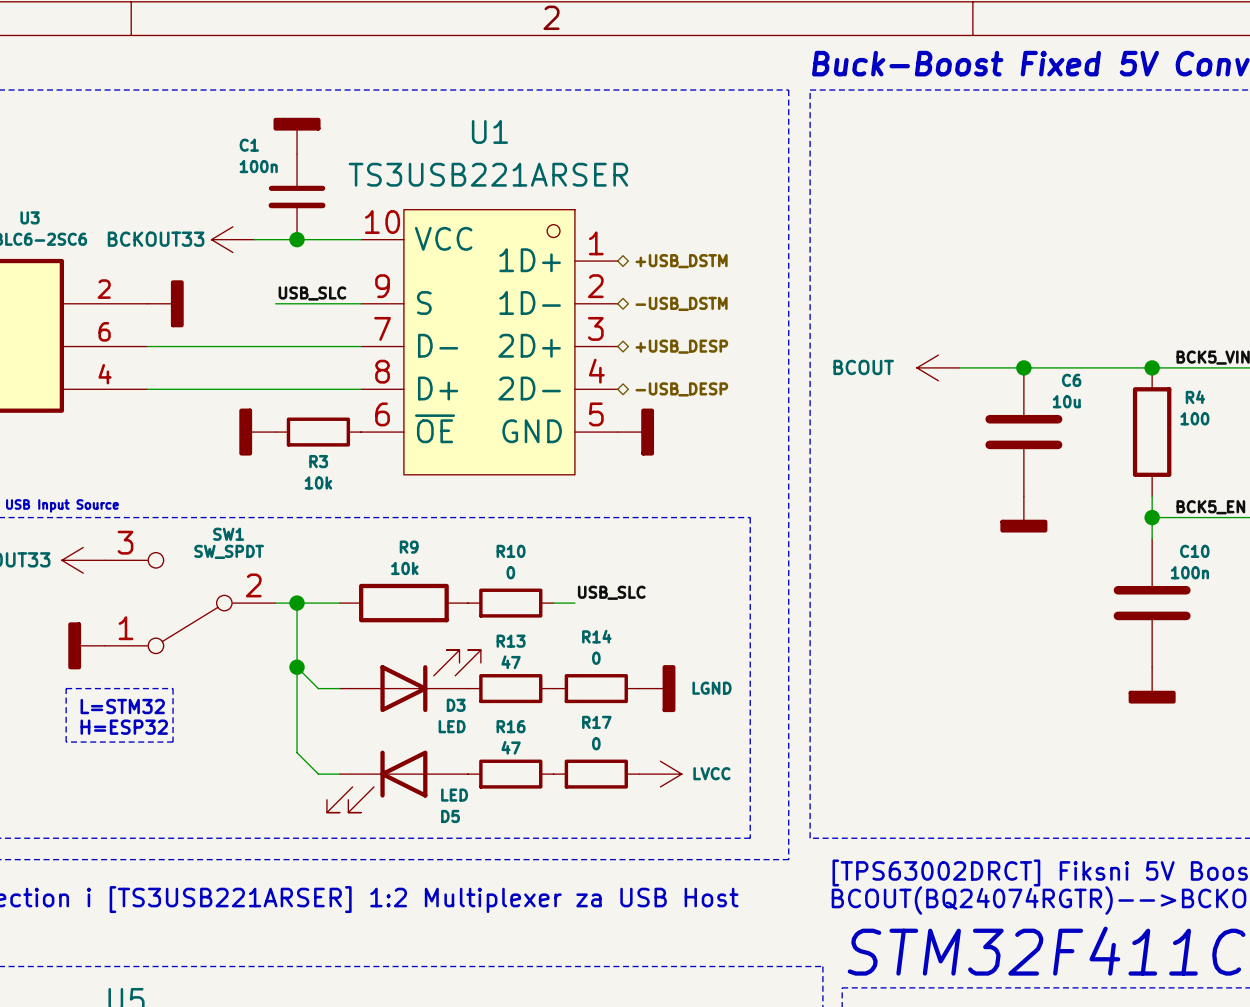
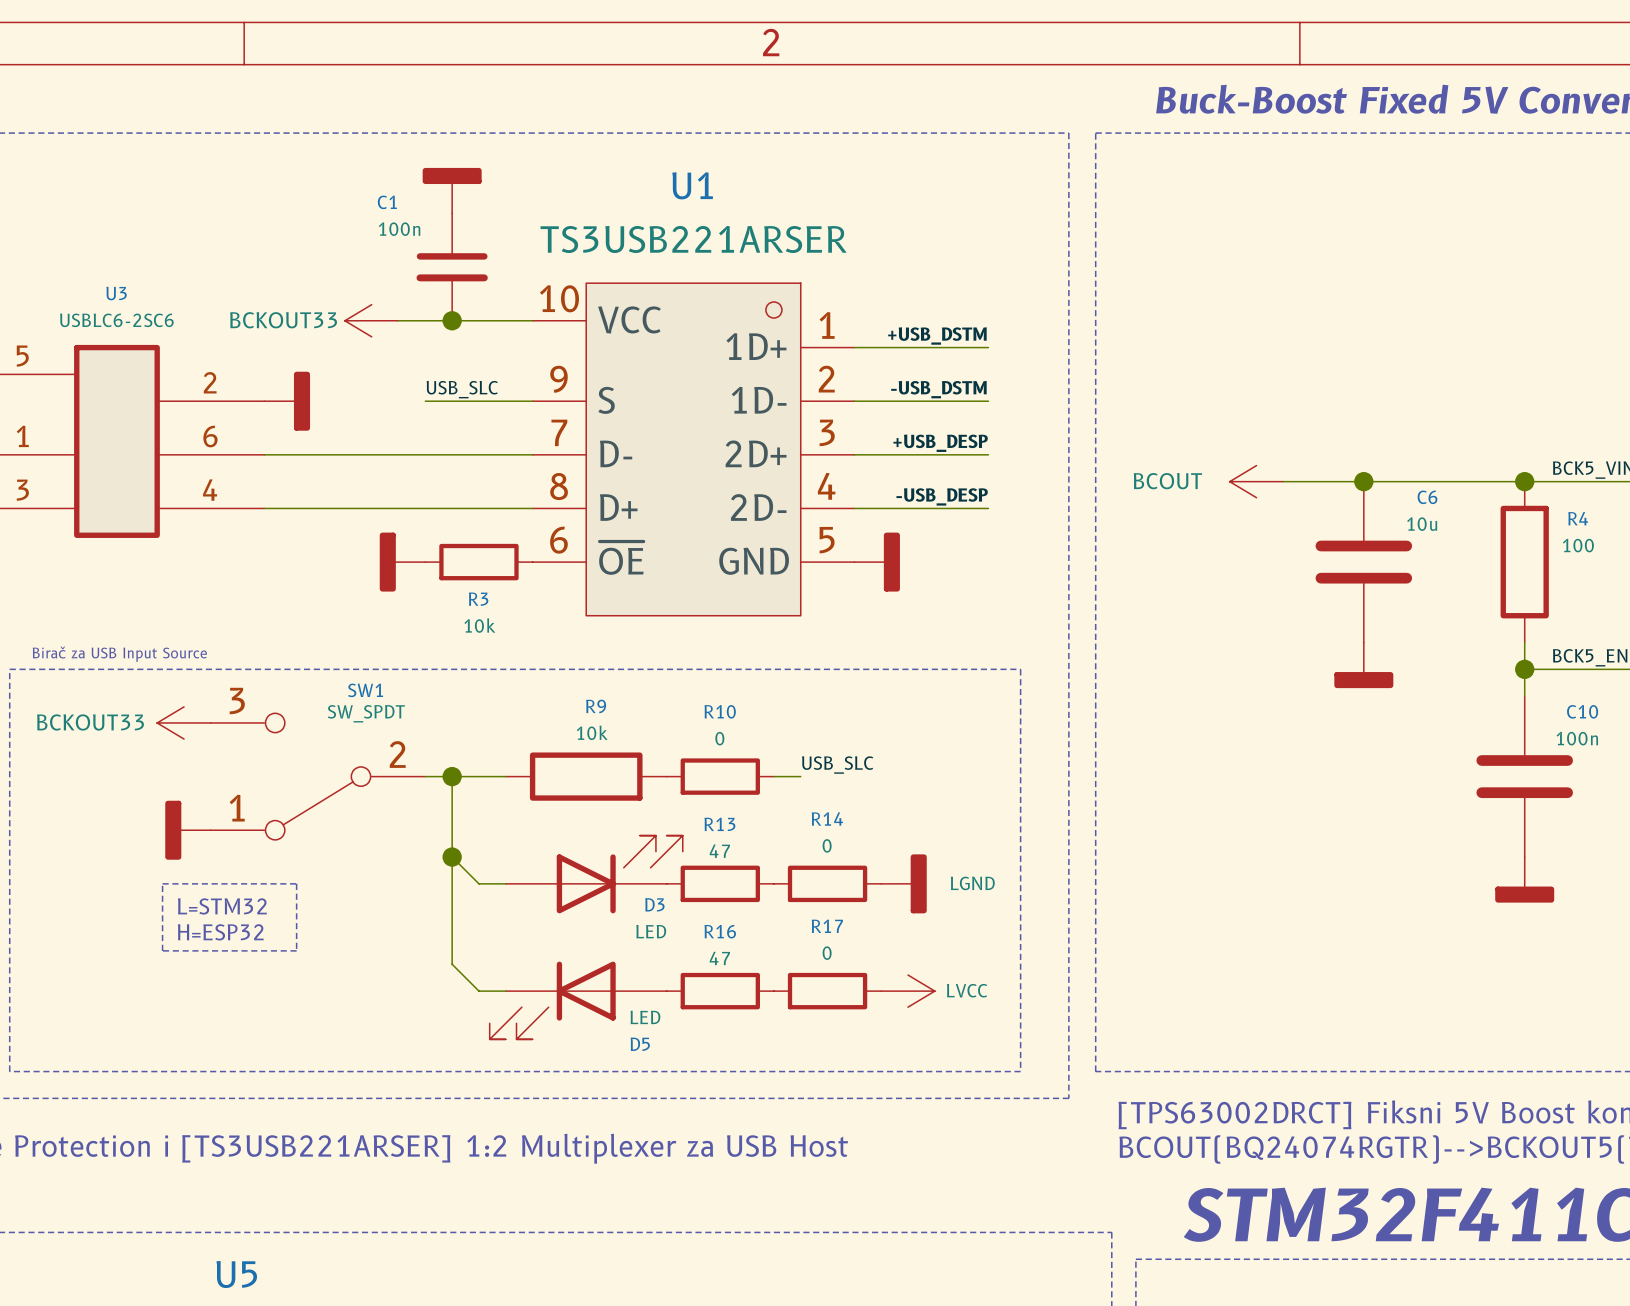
label: none -> +USB_DSTM (937, 336)
wire: none -> (854, 347) (988, 347)
hierarchical label: +USB_DSTM (681, 261) -> none
label: none -> -USB_DSTM (938, 389)
wire: none -> (854, 401) (988, 401)
hierarchical label: -USB_DSTM (681, 303) -> none
label: none -> +USB_DESP (940, 443)
wire: none -> (854, 454) (988, 454)
hierarchical label: +USB_DESP (681, 346) -> none
label: none -> -USB_DESP (942, 496)
wire: none -> (854, 508) (988, 508)
hierarchical label: -USB_DESP (681, 389) -> none

